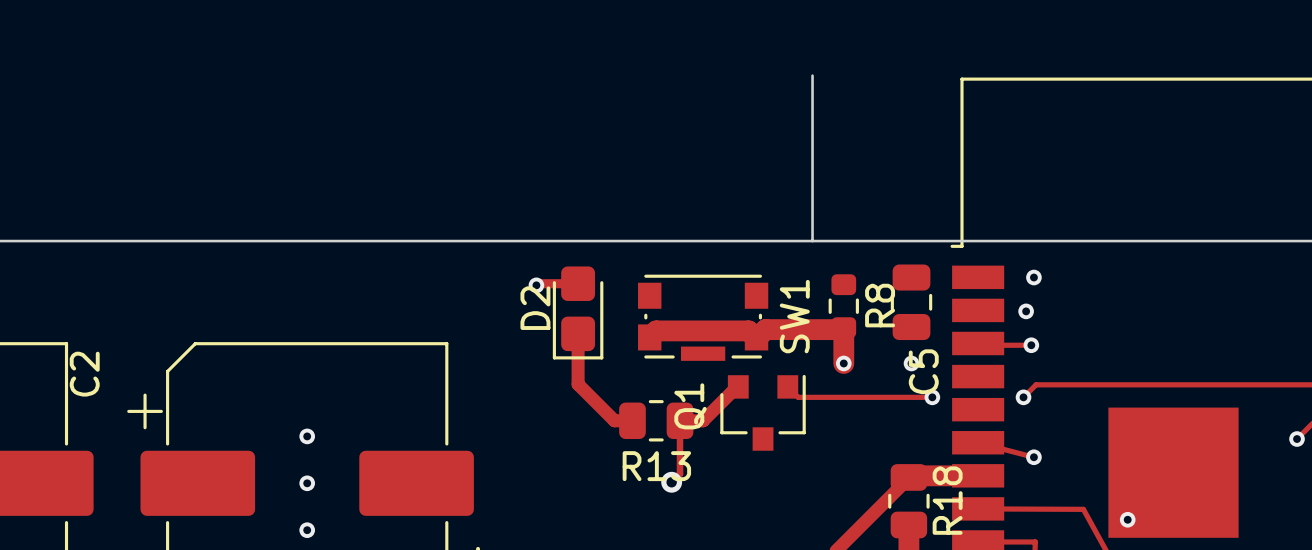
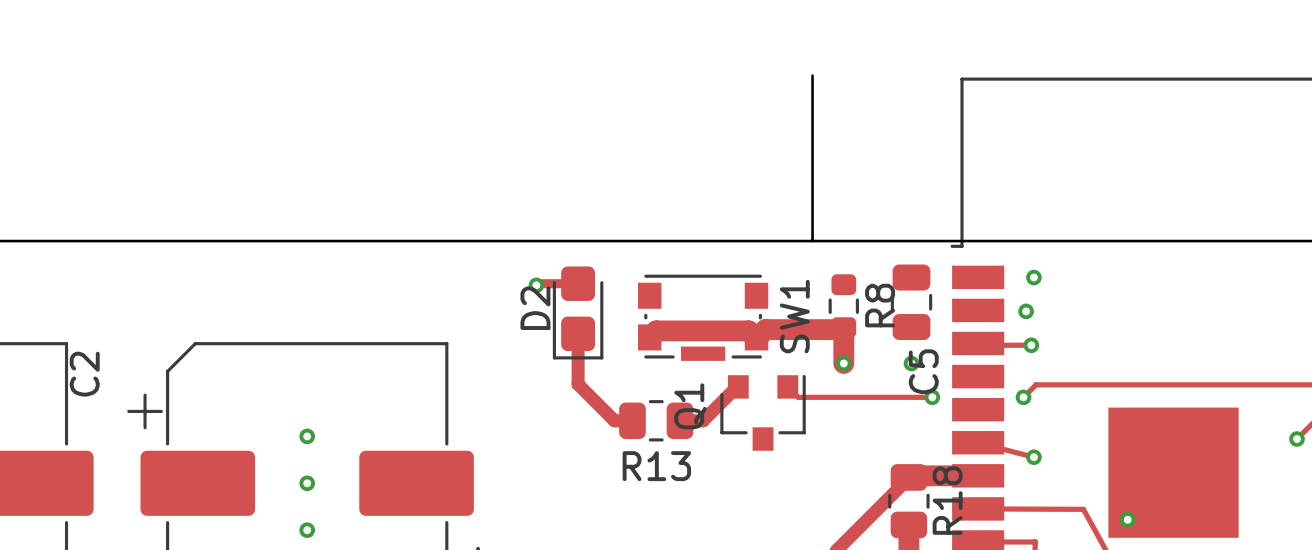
track: (680, 420) (680, 473) (671, 482) -> none
via: (671, 482) -> none

